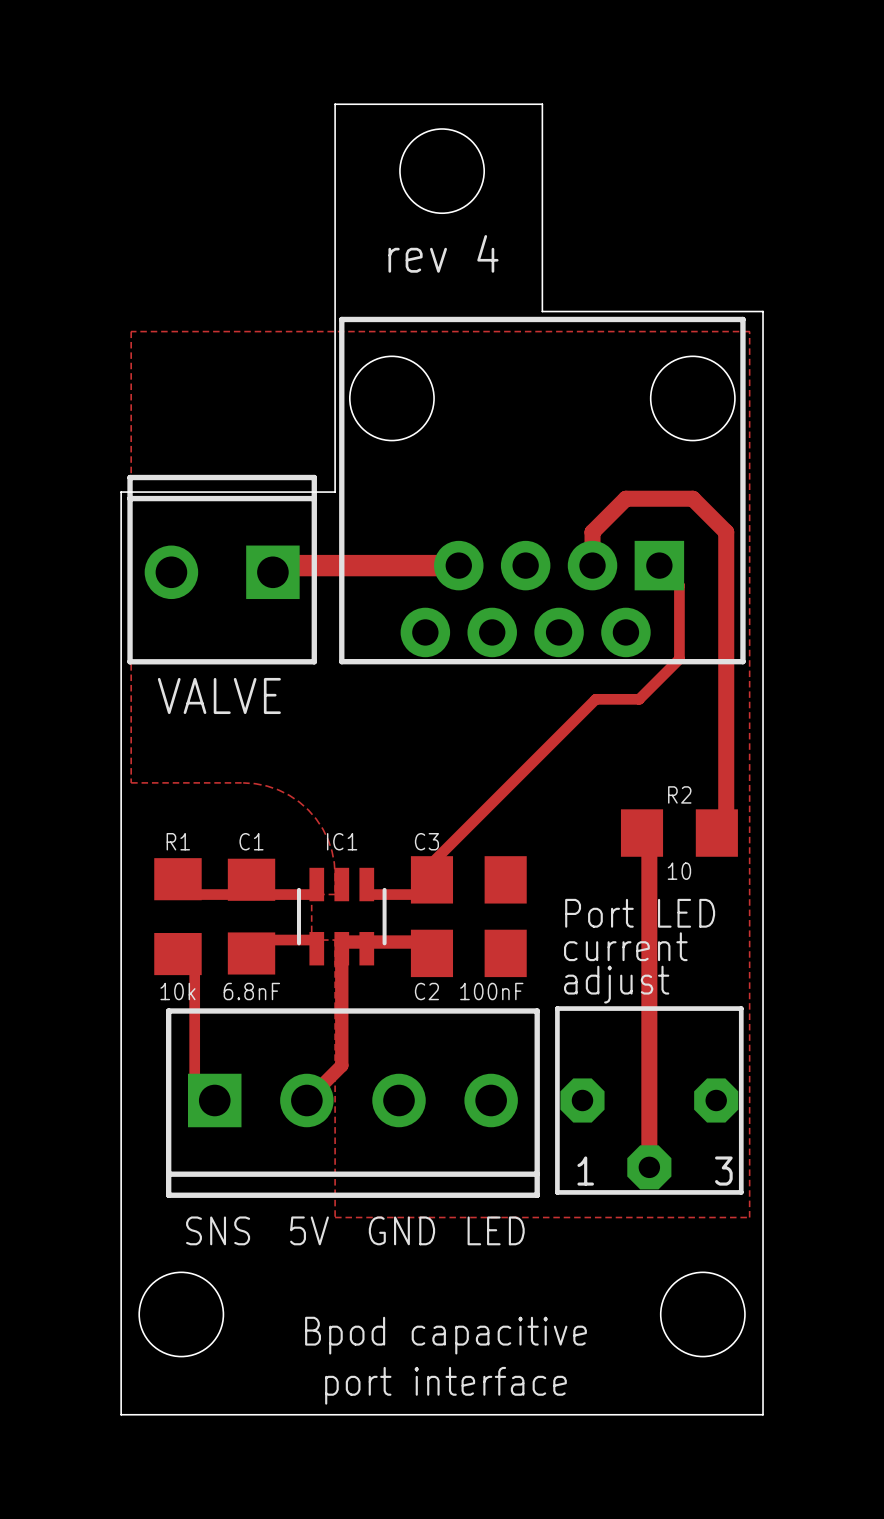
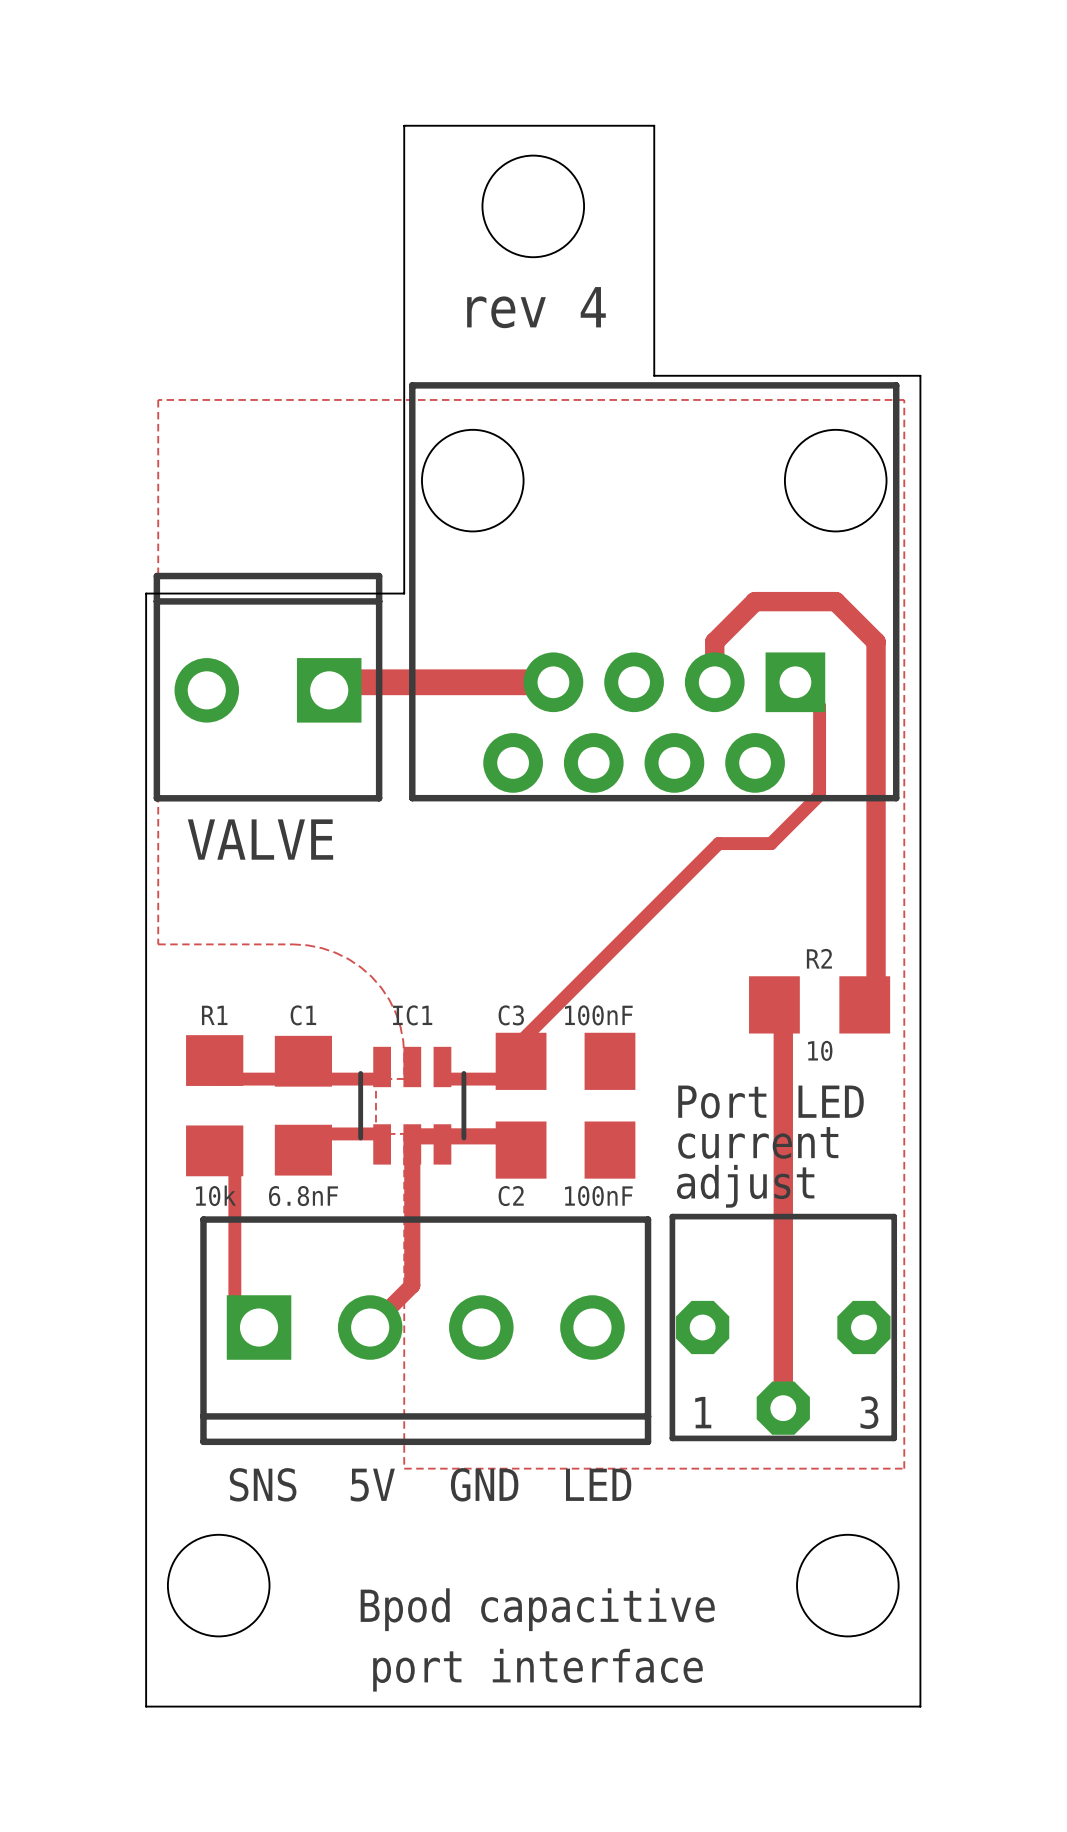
C3 value: none -> 100nF (598, 1015)

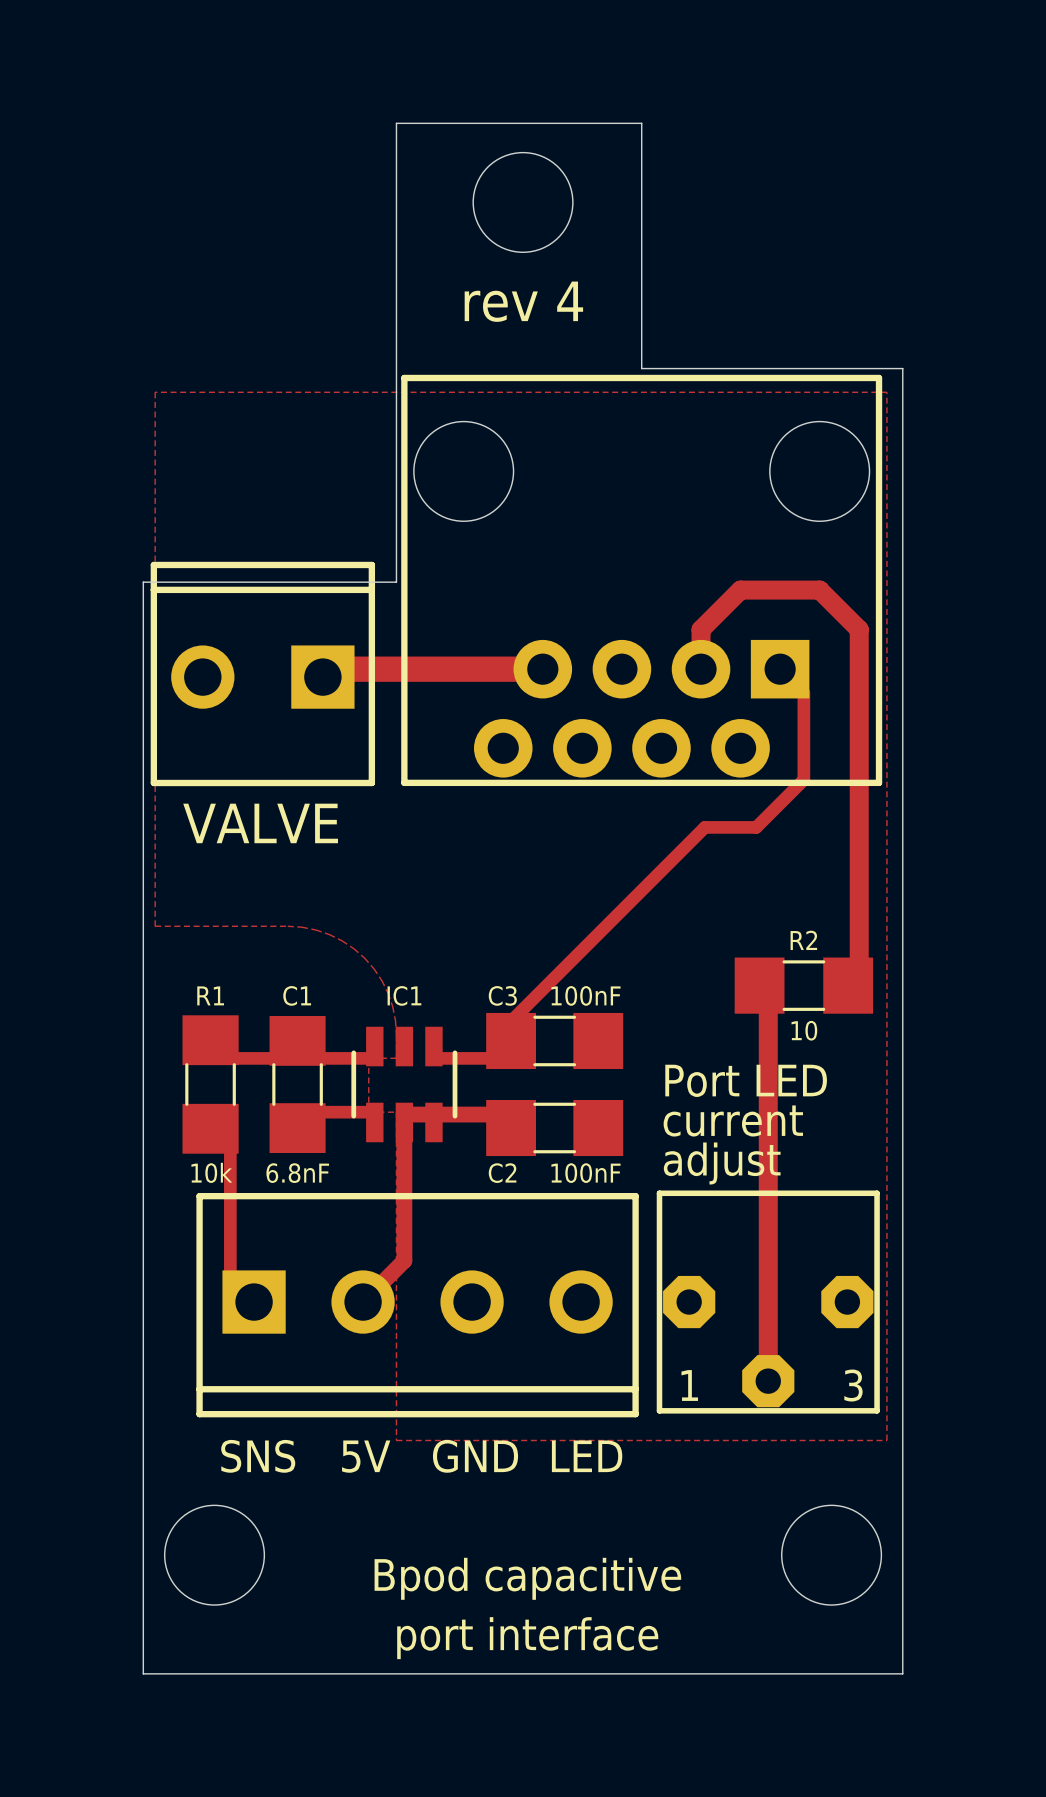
line: none -> (784, 961) (823, 961)
line: none -> (784, 1009) (823, 1009)
line: none -> (534, 1017) (574, 1017)
line: none -> (186, 1064) (186, 1104)
line: none -> (234, 1064) (234, 1104)
line: none -> (273, 1064) (273, 1104)
line: none -> (321, 1064) (321, 1104)
line: none -> (534, 1064) (574, 1064)
line: none -> (534, 1104) (574, 1104)
line: none -> (534, 1151) (574, 1151)

